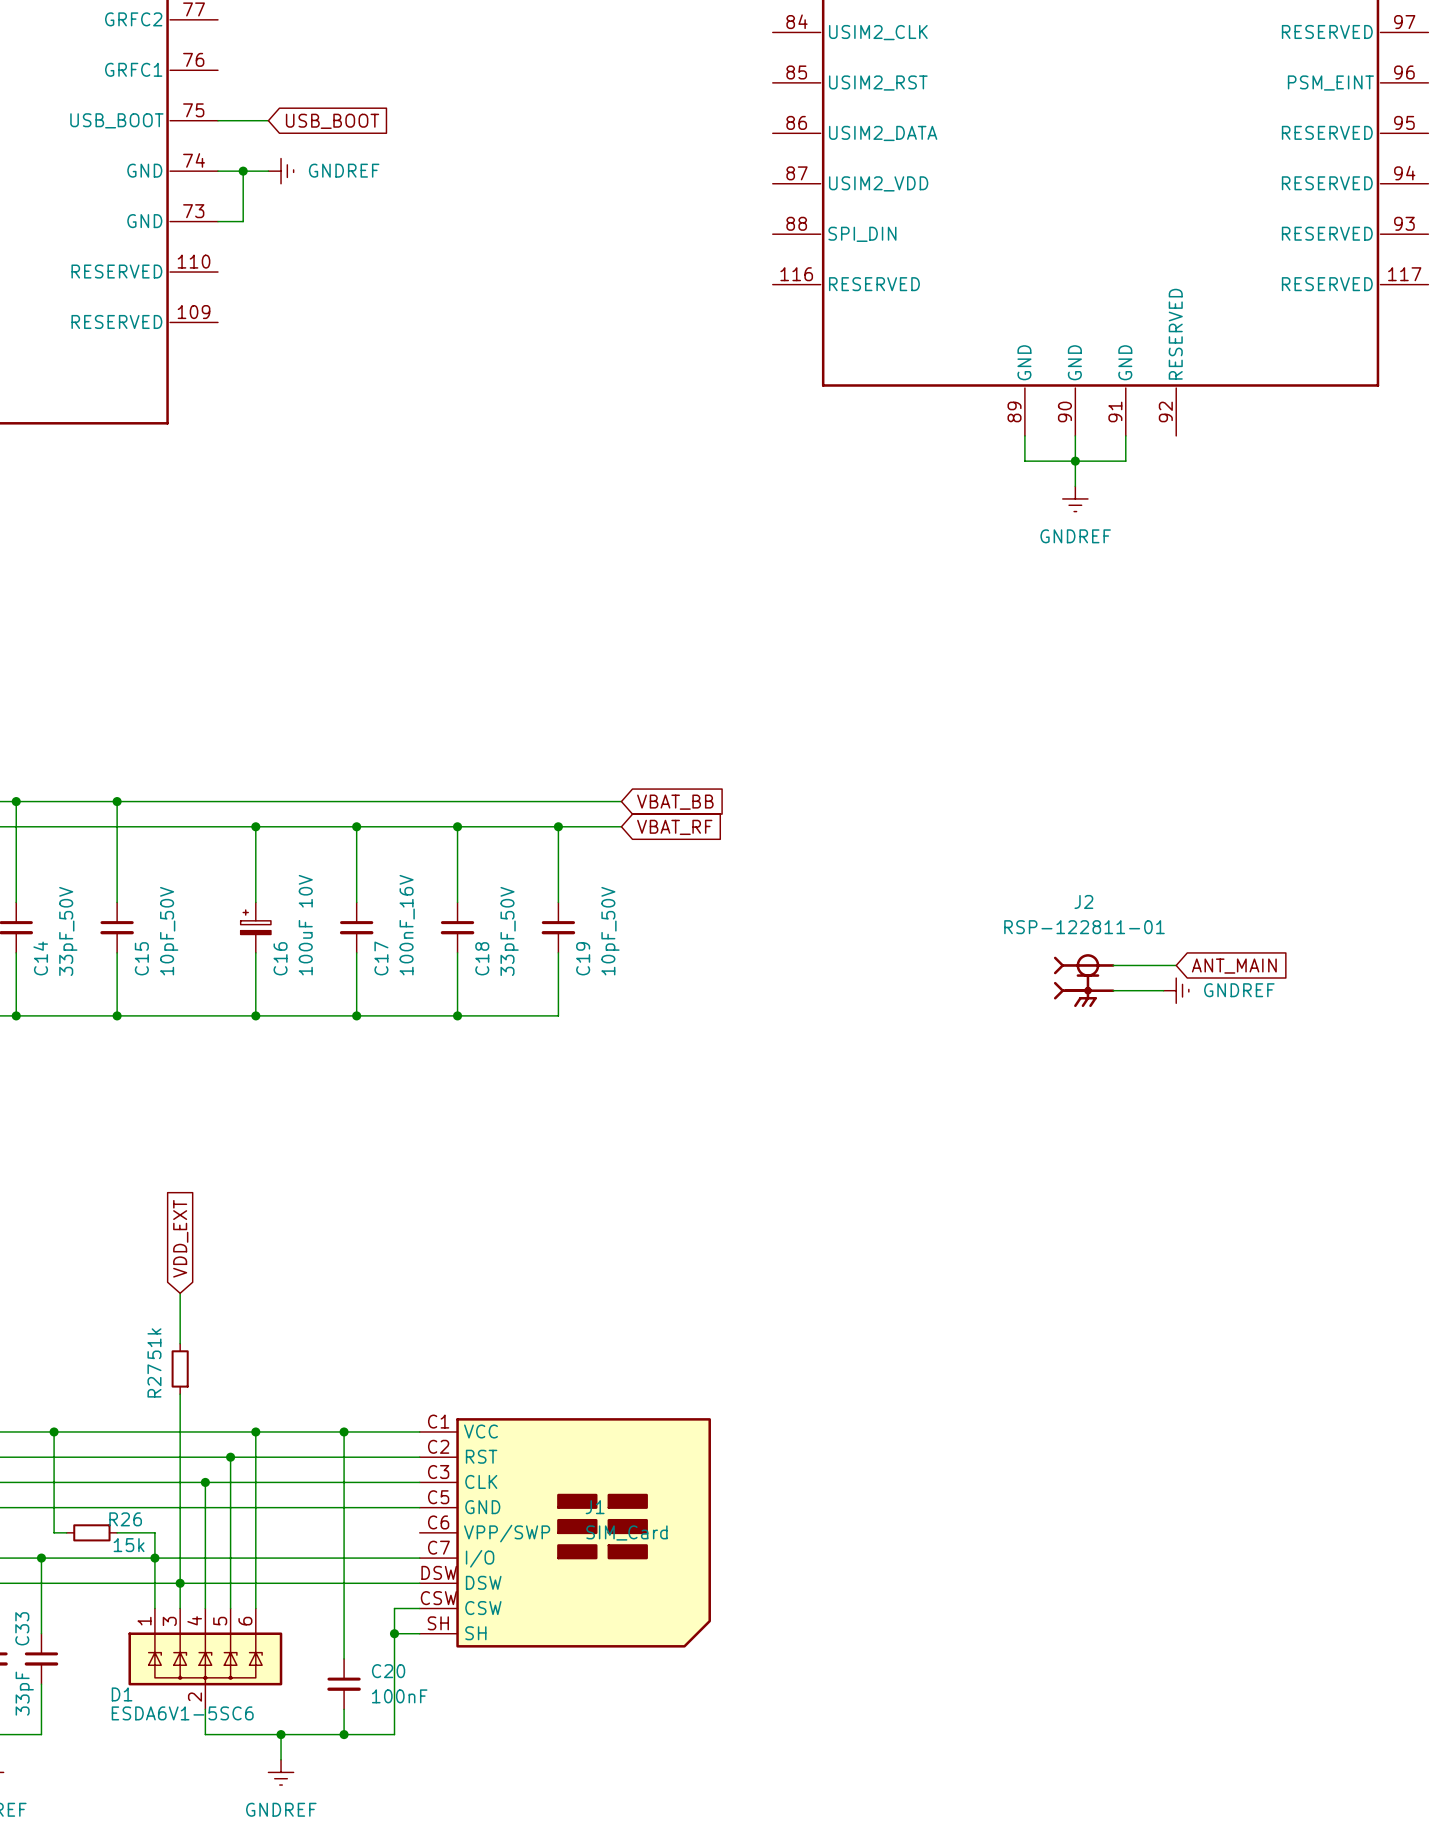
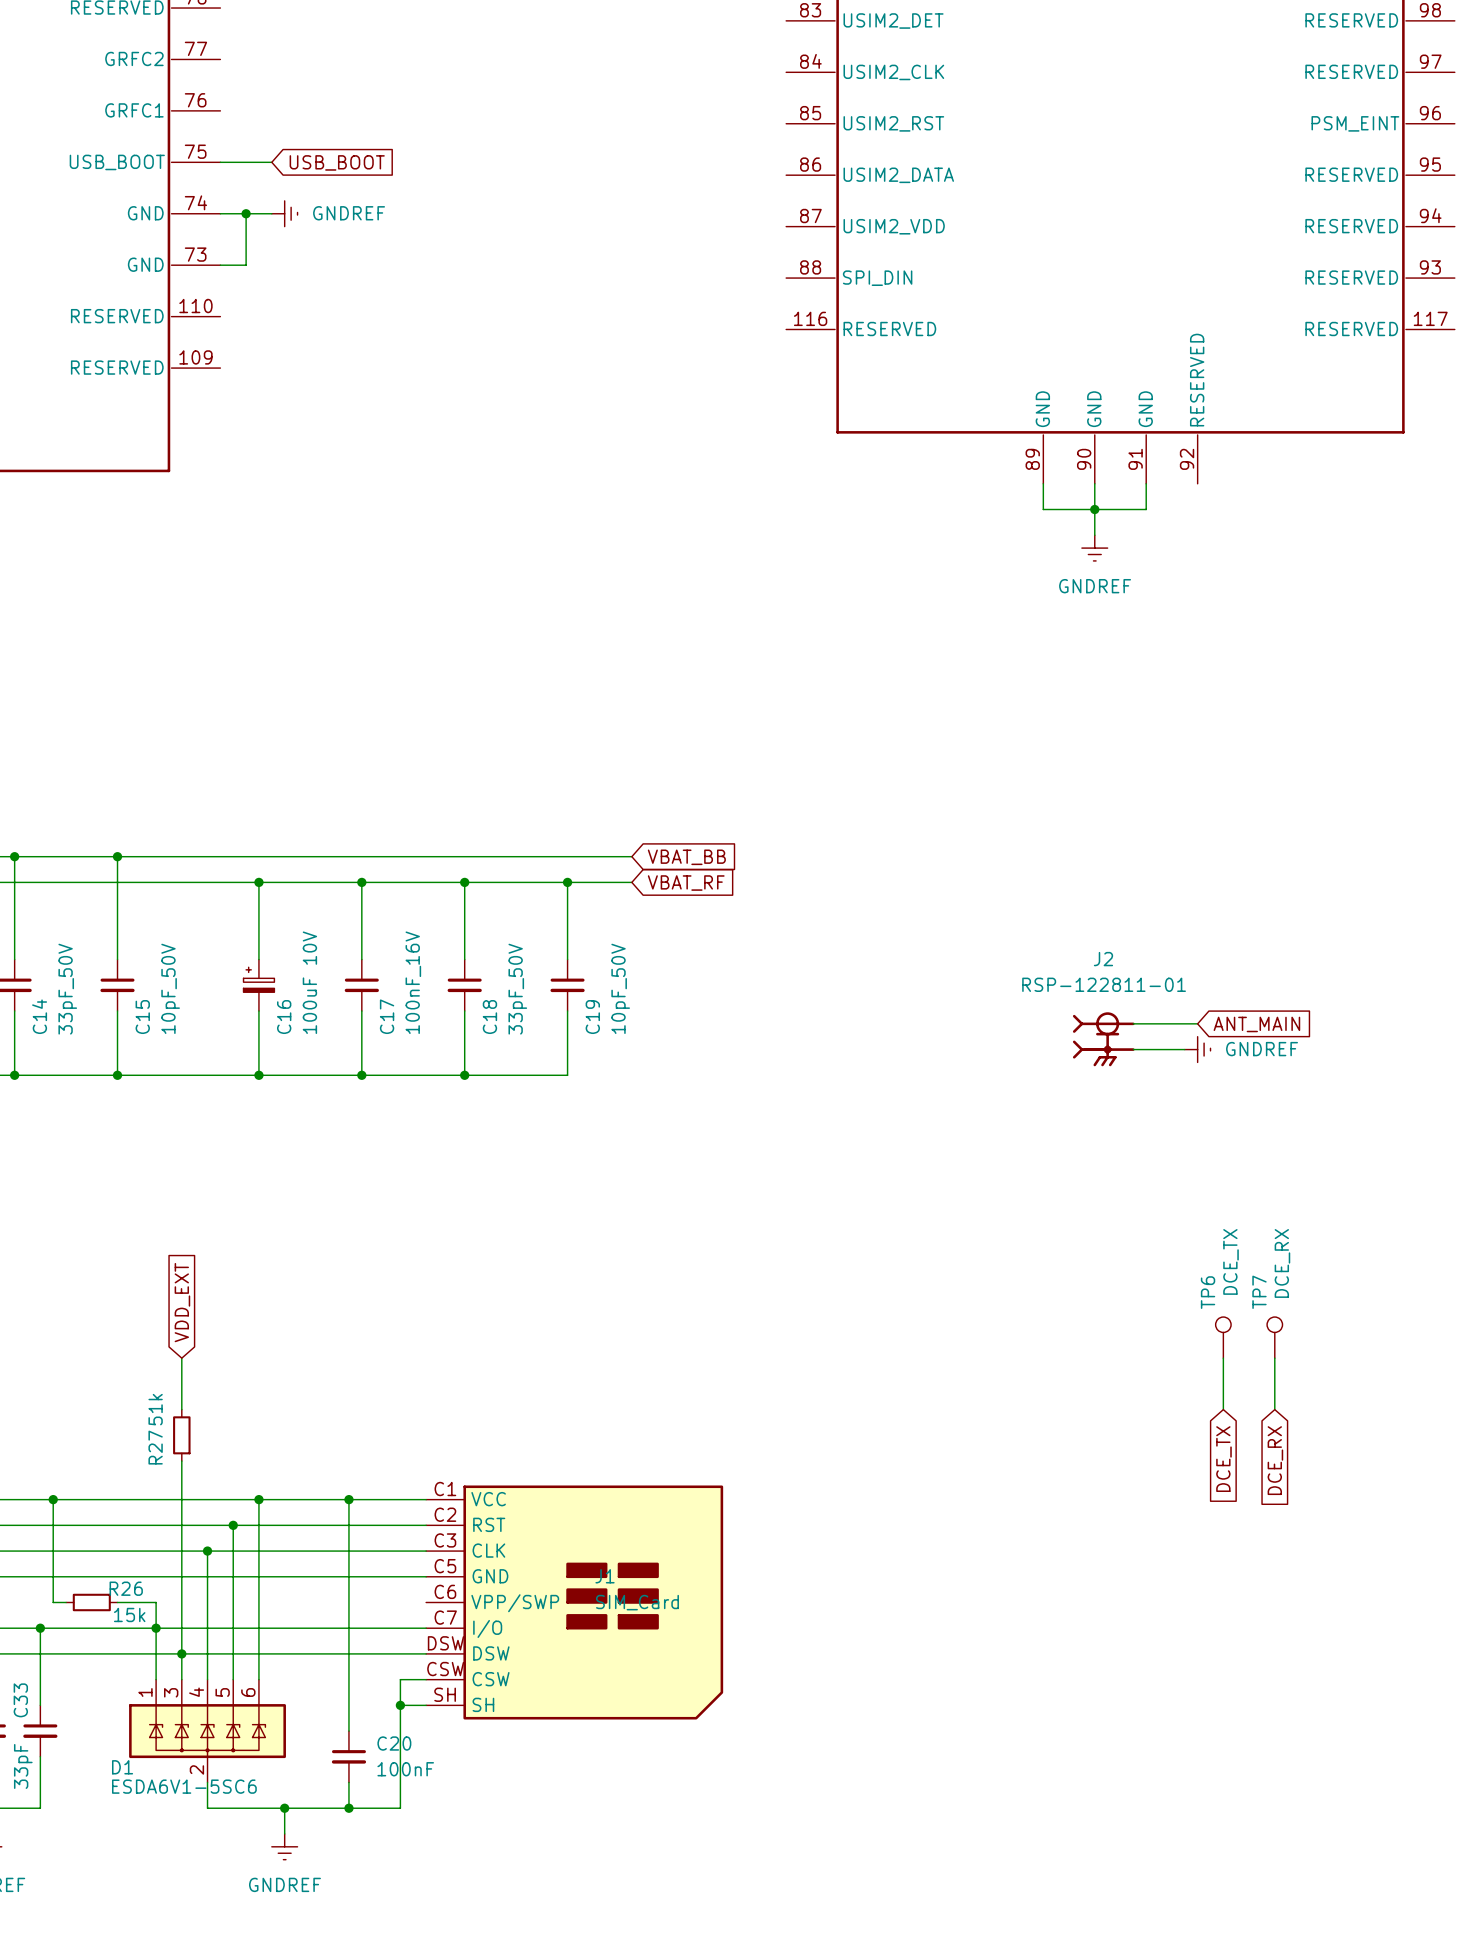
TP6: none -> DCE_TX (1223, 1337)
TP7: none -> DCE_RX (1274, 1337)
wire: none -> (1223, 1358) (1223, 1409)
wire: none -> (1274, 1358) (1274, 1409)
global label: none -> DCE_TX (1223, 1459)
global label: none -> DCE_RX (1275, 1460)

